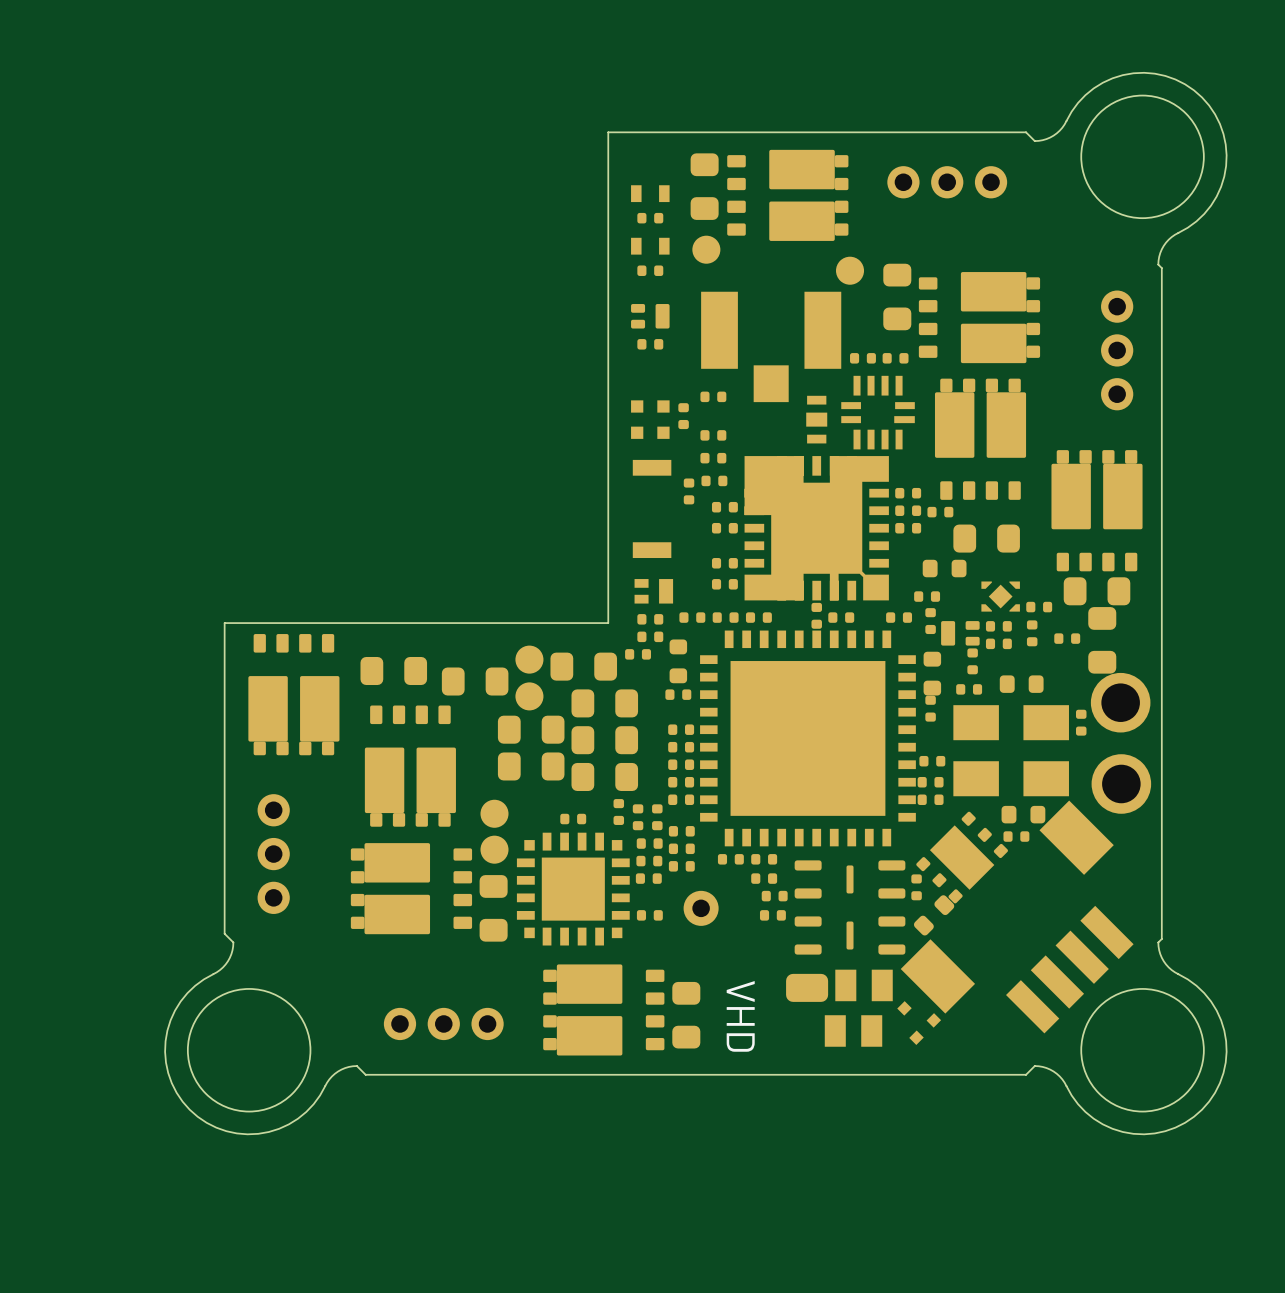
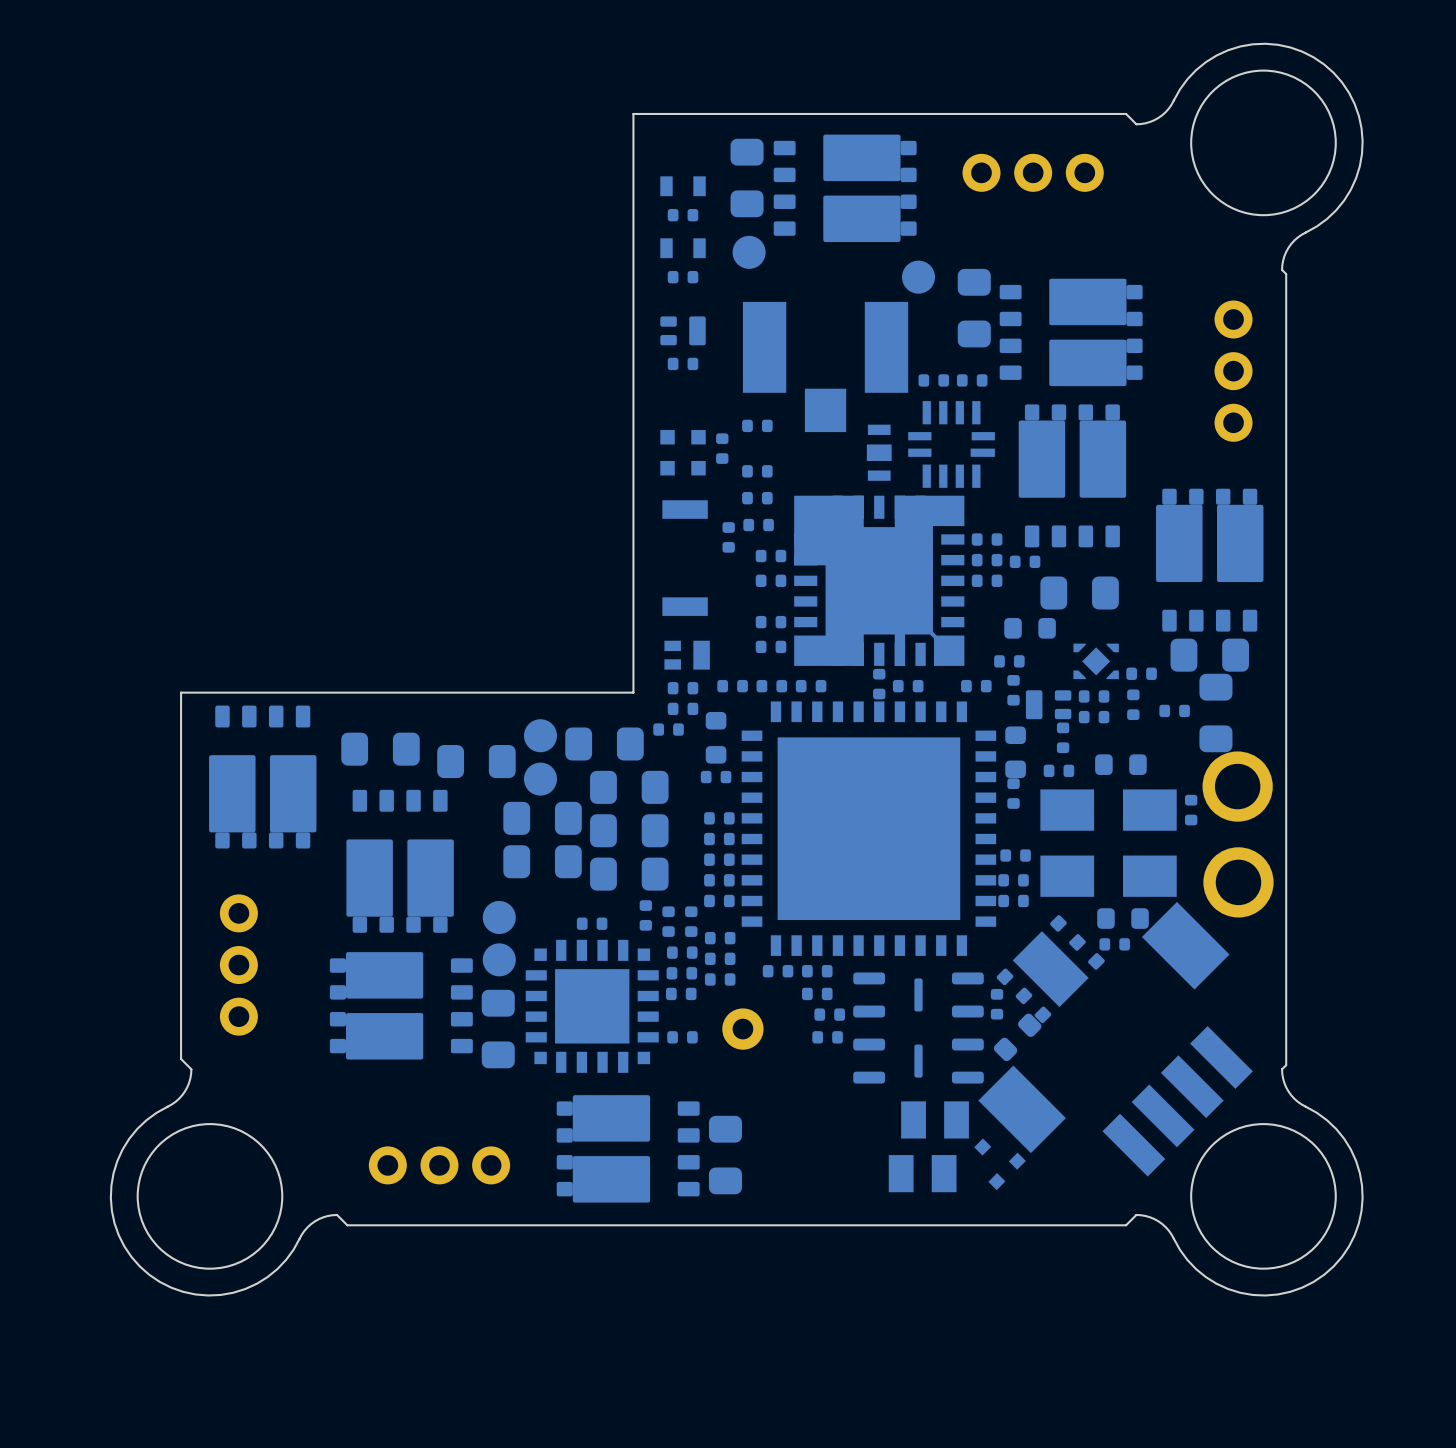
part: (807, 987) -> none
text: VHD (740, 1016) -> none

